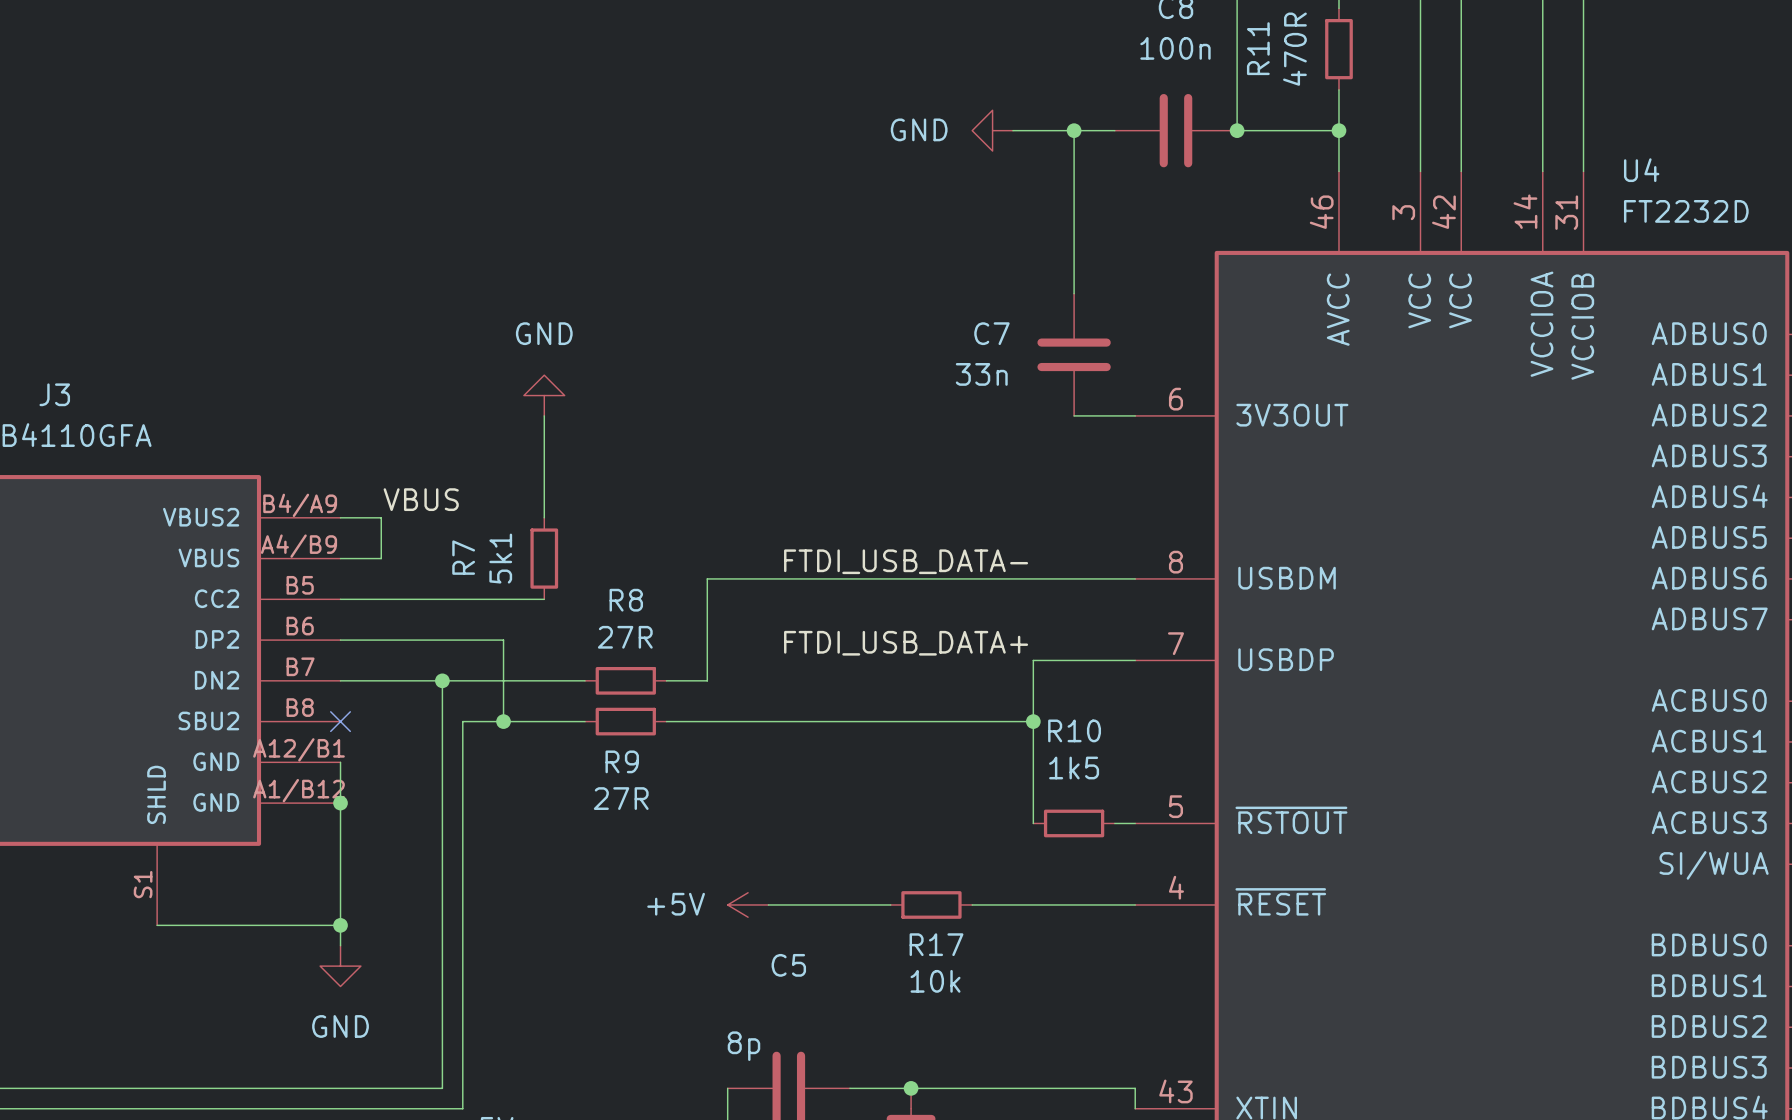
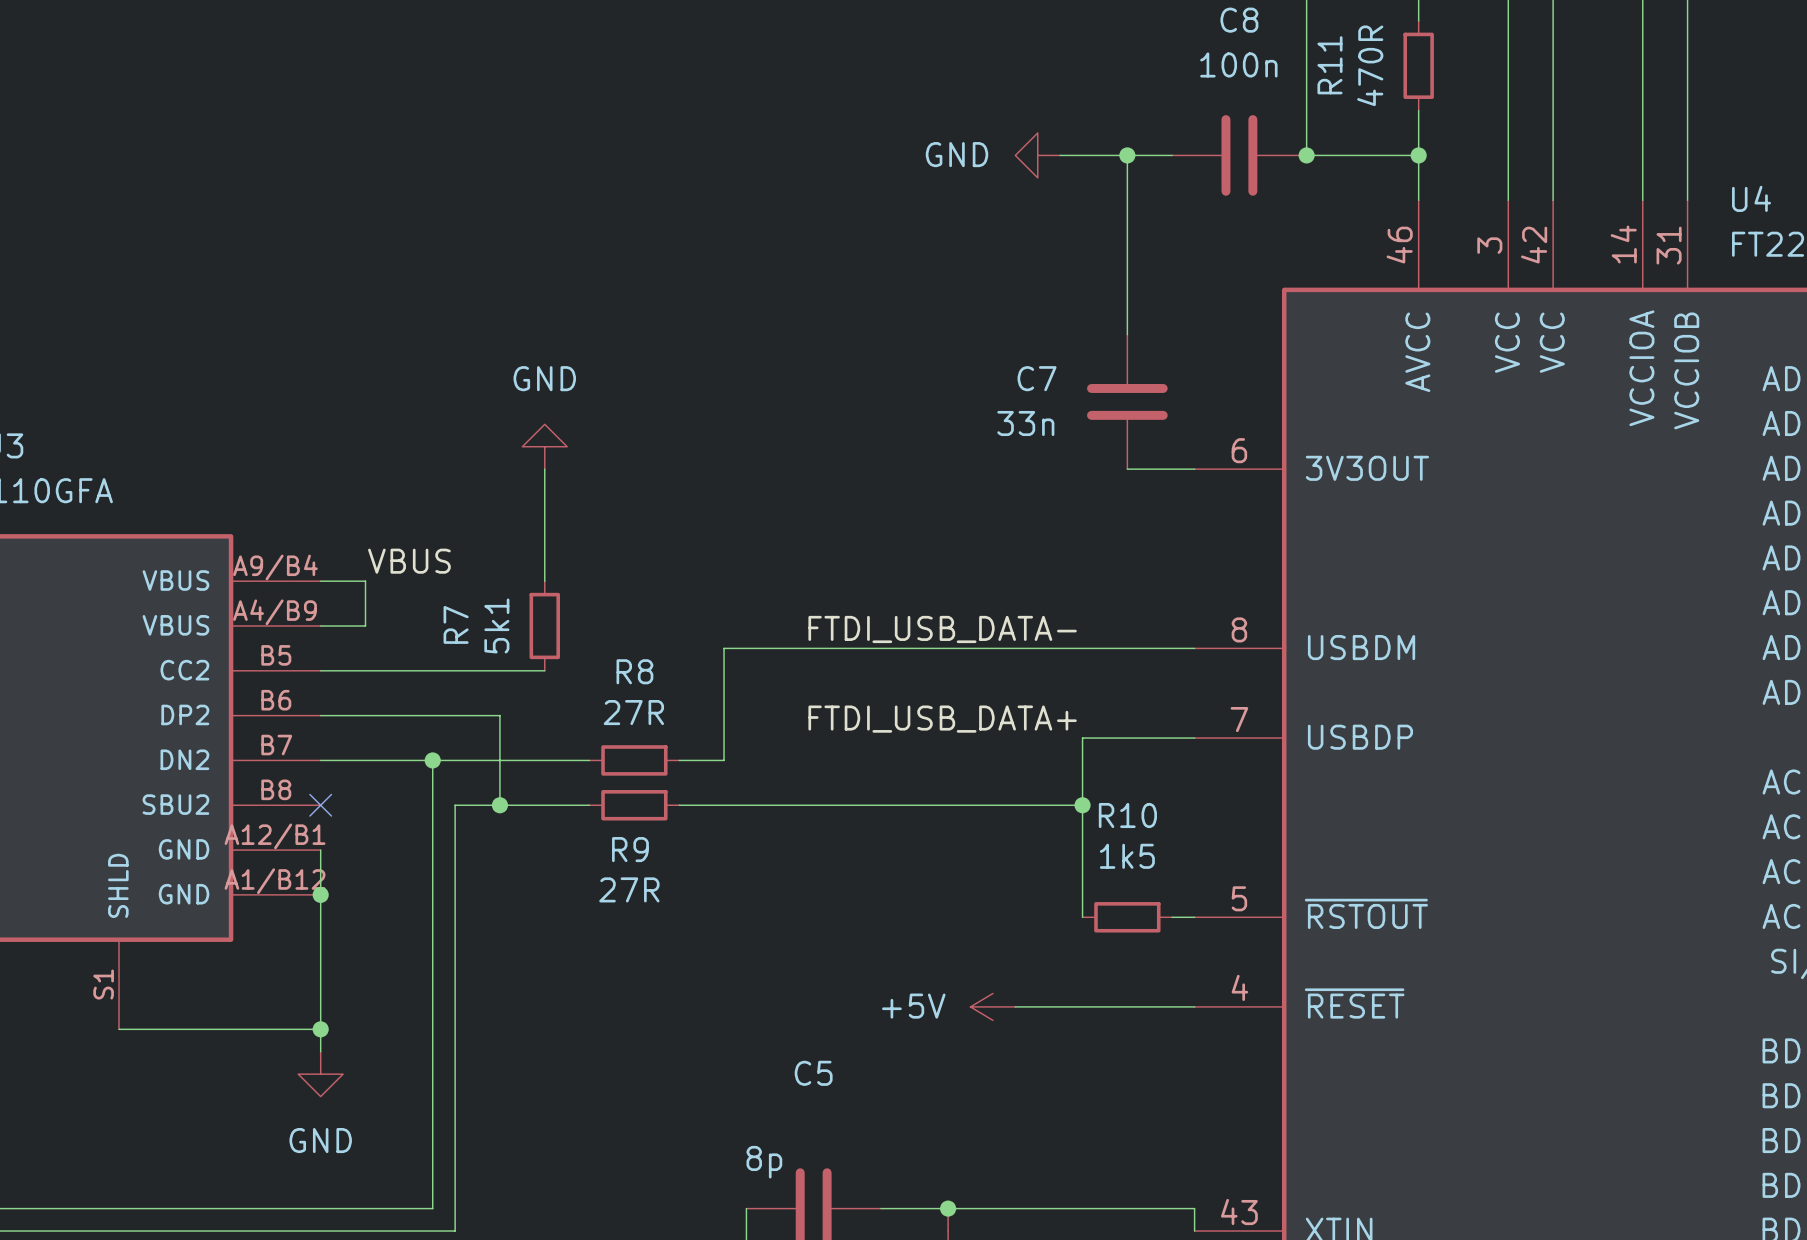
J3 pin number: B4/A9 (300, 505) -> A9/B4 (275, 567)
J3 pin name: VBUS2 (201, 517) -> VBUS (175, 580)
power symbol position: +5V (748, 904) -> +5V (992, 1006)
wire: (768, 904) (890, 904) -> none
R17: 10k (931, 904) -> none

